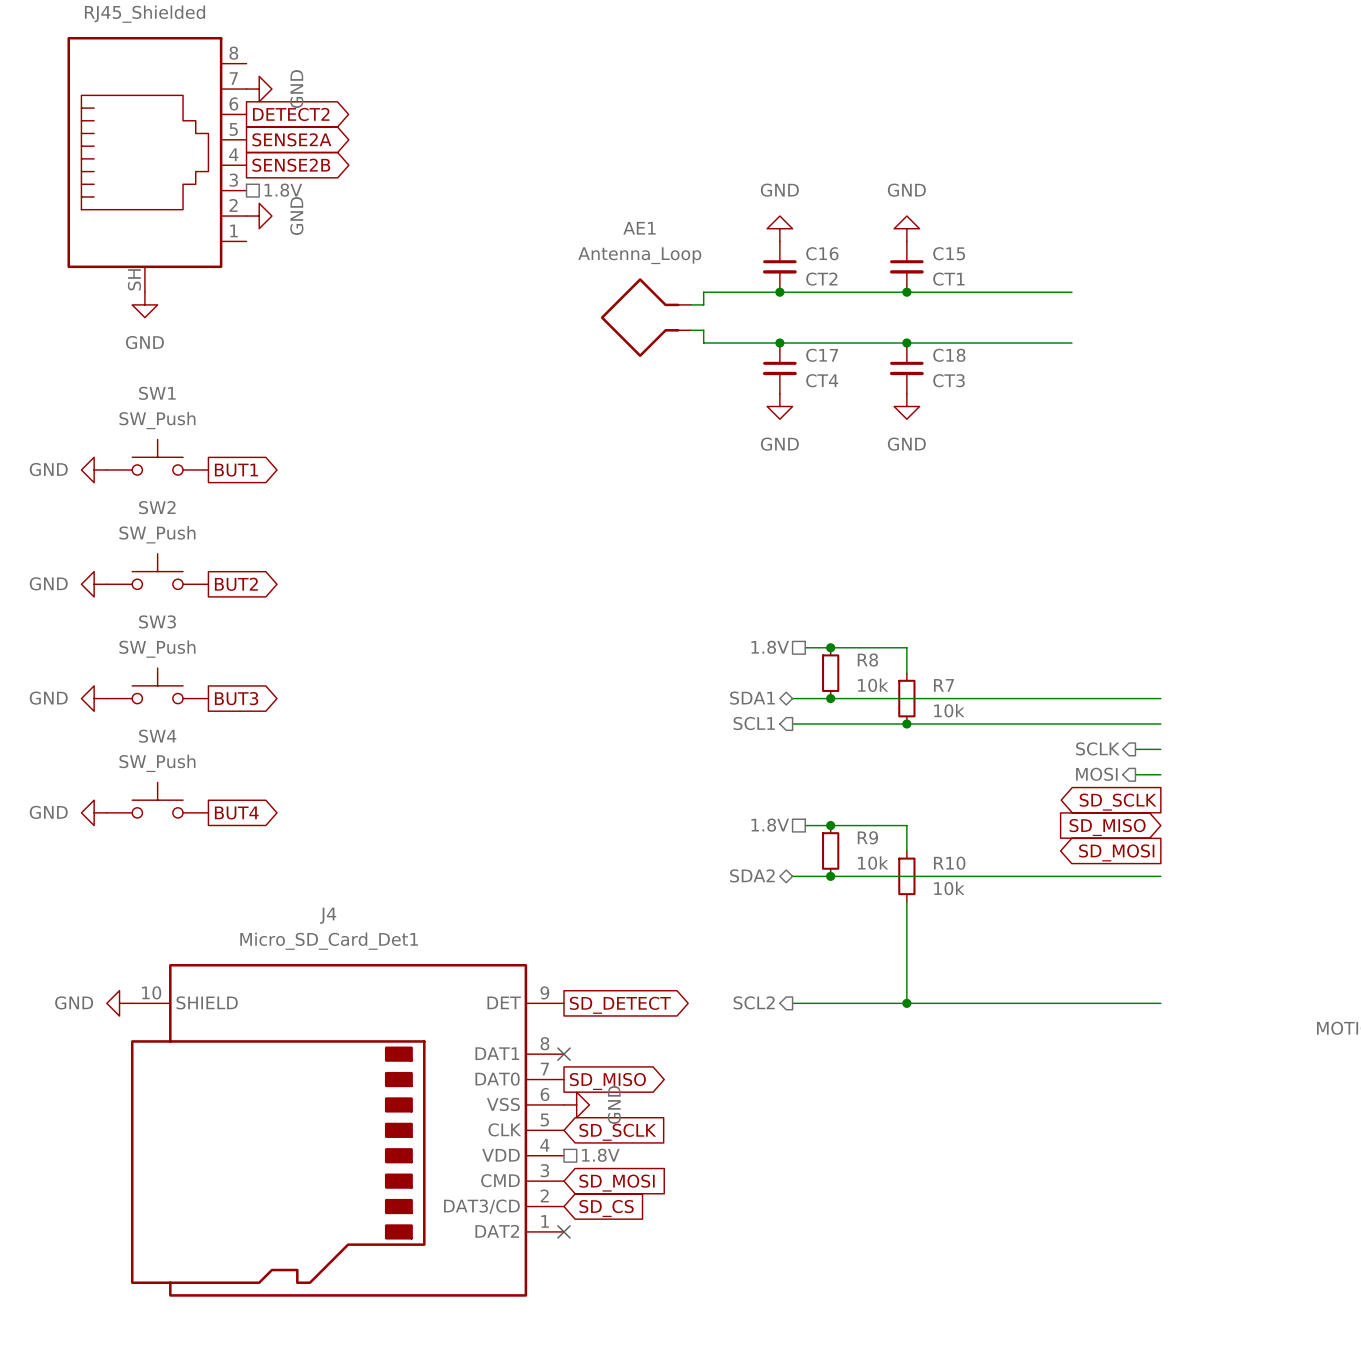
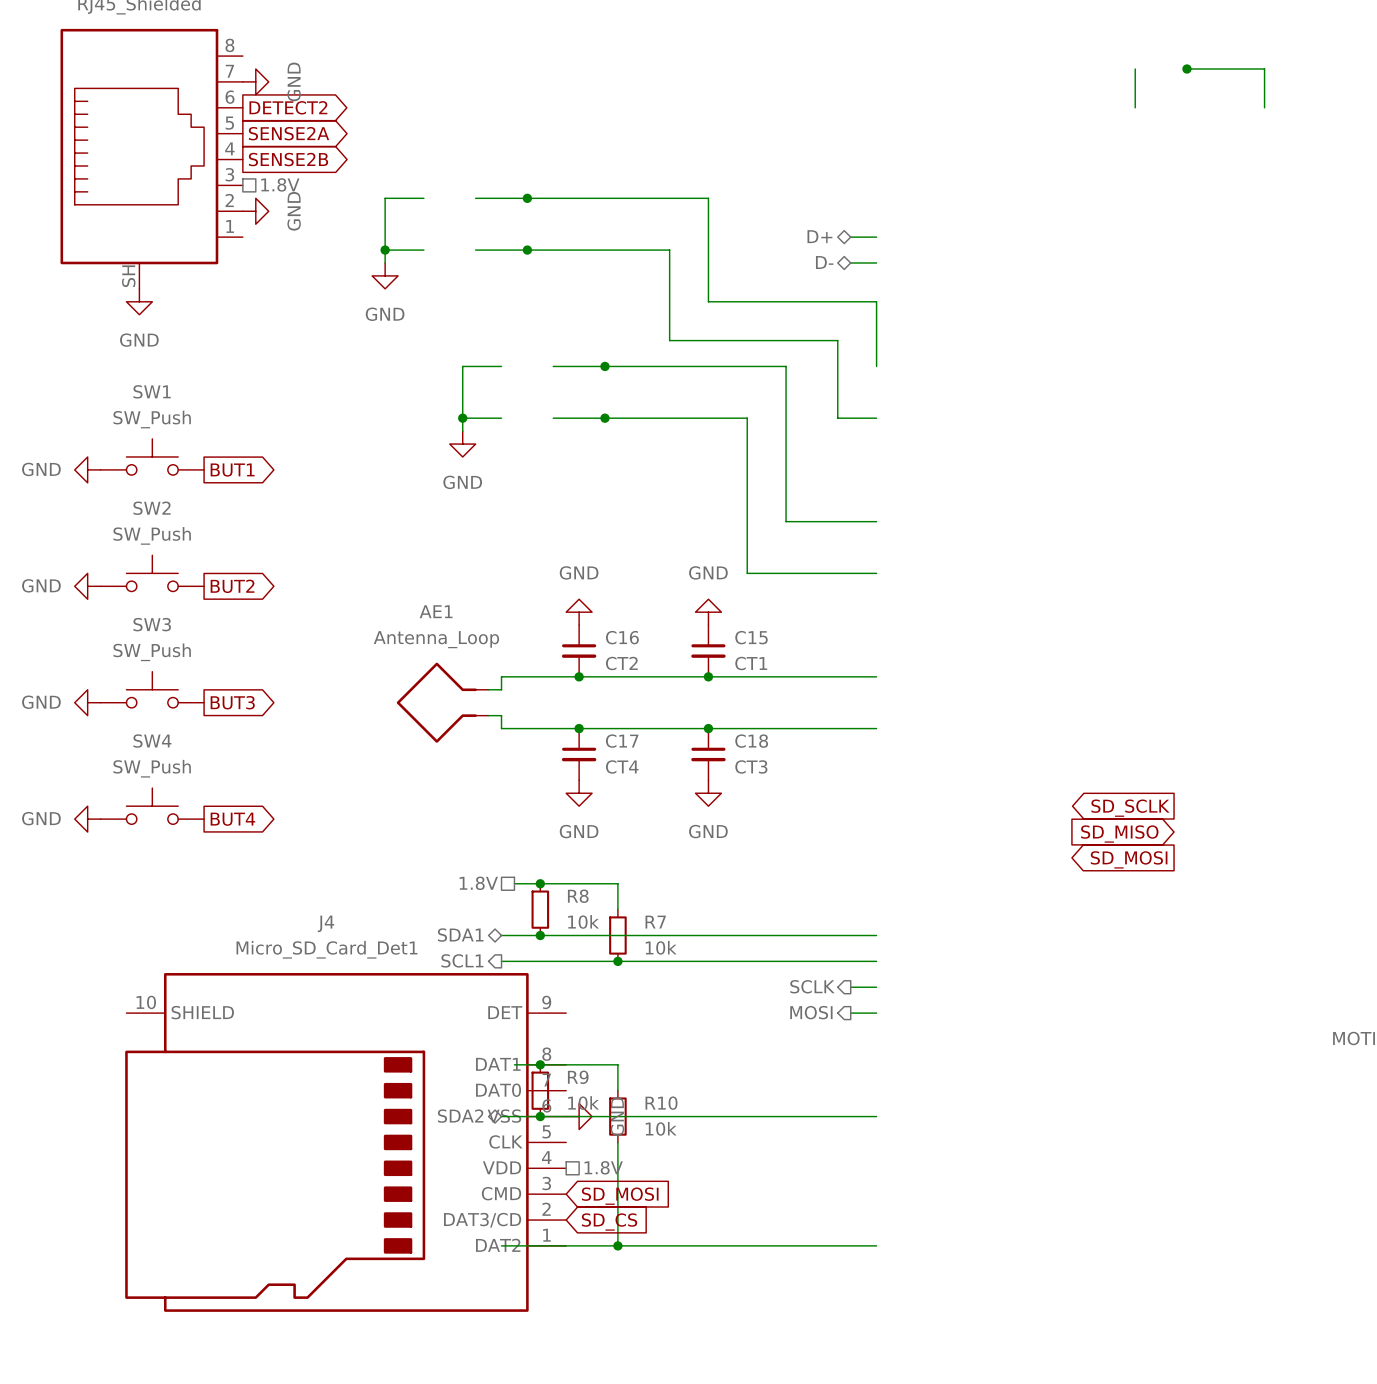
wire: none -> (1135, 69) (1135, 107)
wire: none -> (1186, 69) (1264, 69) (1264, 107)
junction: none -> (1186, 69)
wire: none -> (423, 198) (385, 198) (385, 262)
junction: none -> (527, 198)
power symbol: GND (779, 228) -> none
power symbol: GND (906, 228) -> none
hierarchical label: none -> D+ (819, 236)
wire: none -> (850, 237) (876, 237)
wire: none -> (385, 250) (423, 250)
junction: none -> (385, 250)
junction: none -> (527, 250)
C16 position: (779, 266) -> (579, 650)
hierarchical label: none -> D- (824, 262)
wire: none -> (850, 262) (876, 262)
C15 position: (906, 266) -> (708, 650)
power symbol: none -> GND (385, 275)
wire: (703, 292) (1071, 292) -> (708, 288) (708, 198) (475, 198)
junction: (779, 292) -> none
junction: (906, 292) -> none
wire: (690, 304) (703, 304) -> (876, 366) (876, 301) (708, 301)
AE1 position: (645, 317) -> (442, 702)
wire: (690, 330) (703, 330) (703, 343) -> (475, 250) (669, 250) (669, 340) (708, 340)
junction: (779, 343) -> none
wire: (830, 343) (1071, 343) -> (837, 340) (837, 418) (876, 418)
junction: (906, 343) -> none
wire: none -> (501, 366) (462, 366) (462, 431)
wire: none -> (553, 366) (786, 366) (786, 521) (876, 521)
junction: none -> (604, 366)
C17 position: (779, 368) -> (579, 754)
C18 position: (906, 368) -> (708, 754)
power symbol: GND (779, 406) -> none
power symbol: GND (906, 406) -> none
wire: none -> (462, 418) (501, 418)
junction: none -> (462, 418)
wire: none -> (553, 418) (747, 418) (747, 573) (876, 573)
junction: none -> (604, 418)
power symbol: none -> GND (462, 444)
power symbol: none -> GND (579, 612)
power symbol: none -> GND (708, 612)
hierarchical label: 1.8V (770, 647) -> none
wire: (805, 647) (906, 647) (906, 673) -> none
junction: (830, 647) -> none
junction: none -> (579, 676)
junction: none -> (708, 676)
R8 position: (830, 673) -> (540, 909)
wire: none -> (876, 676) (501, 676) (501, 689) (488, 689)
hierarchical label: SDA1 (752, 698) -> none
wire: (792, 698) (1160, 698) -> none
junction: (830, 698) -> none
R7 position: (906, 698) -> (617, 935)
wire: none -> (488, 715) (501, 715) (501, 728) (798, 728)
junction: none -> (579, 728)
junction: none -> (708, 728)
hierarchical label: SCL1 (754, 723) -> none
wire: (868, 723) (1160, 723) -> none
junction: (906, 723) -> none
hierarchical label: SCLK (1097, 748) -> none
wire: (1135, 749) (1160, 749) -> none
hierarchical label: MOSI (1096, 774) -> none
wire: (1135, 774) (1160, 774) -> none
power symbol: none -> GND (579, 793)
power symbol: none -> GND (708, 793)
hierarchical label: 1.8V (770, 825) -> none
wire: (805, 825) (906, 825) (906, 850) -> none
junction: (830, 825) -> none
R9 position: (830, 850) -> (540, 1090)
hierarchical label: none -> 1.8V (478, 883)
hierarchical label: SDA2 (752, 875) -> none
wire: none -> (514, 883) (617, 883) (617, 909)
junction: none -> (540, 883)
wire: (792, 876) (1160, 876) -> none
junction: (830, 876) -> none
R10 position: (906, 876) -> (617, 1116)
wire: (906, 901) (906, 1003) -> none
hierarchical label: none -> SDA1 (460, 935)
wire: none -> (501, 935) (876, 935)
junction: none -> (540, 935)
hierarchical label: none -> SCL1 (462, 960)
wire: none -> (501, 961) (876, 961)
junction: none -> (617, 961)
wire: none -> (850, 987) (876, 987)
hierarchical label: SCL2 (754, 1002) -> SCLK (812, 986)
hierarchical label: none -> MOSI (811, 1012)
power symbol: GND (119, 1003) -> none
wire: (792, 1003) (843, 1003) -> none
wire: (868, 1003) (1160, 1003) -> none
junction: (906, 1003) -> none
global label: SD_DETECT (620, 1005) -> none
wire: none -> (514, 1064) (617, 1064) (617, 1090)
junction: none -> (540, 1064)
no-connect mark: (563, 1054) -> none
global label: SD_MISO (607, 1081) -> none
hierarchical label: none -> SDA2 (460, 1116)
wire: none -> (501, 1116) (876, 1116)
junction: none -> (540, 1116)
wire: none -> (617, 1142) (617, 1245)
global label: SD_SCLK (617, 1132) -> none
wire: none -> (501, 1245) (876, 1245)
no-connect mark: (563, 1231) -> none
junction: none -> (617, 1245)

